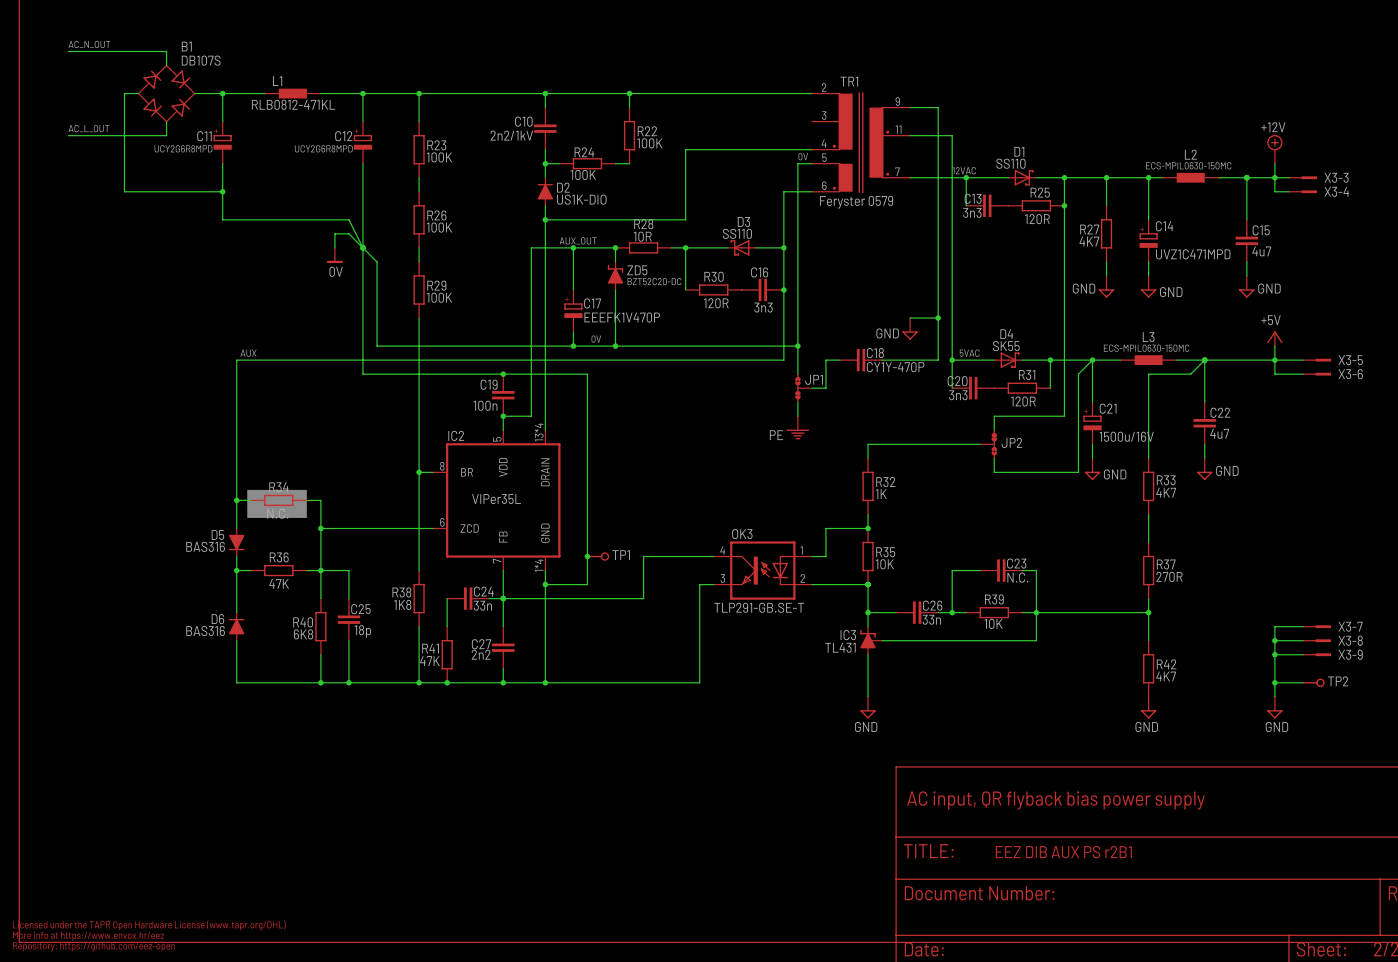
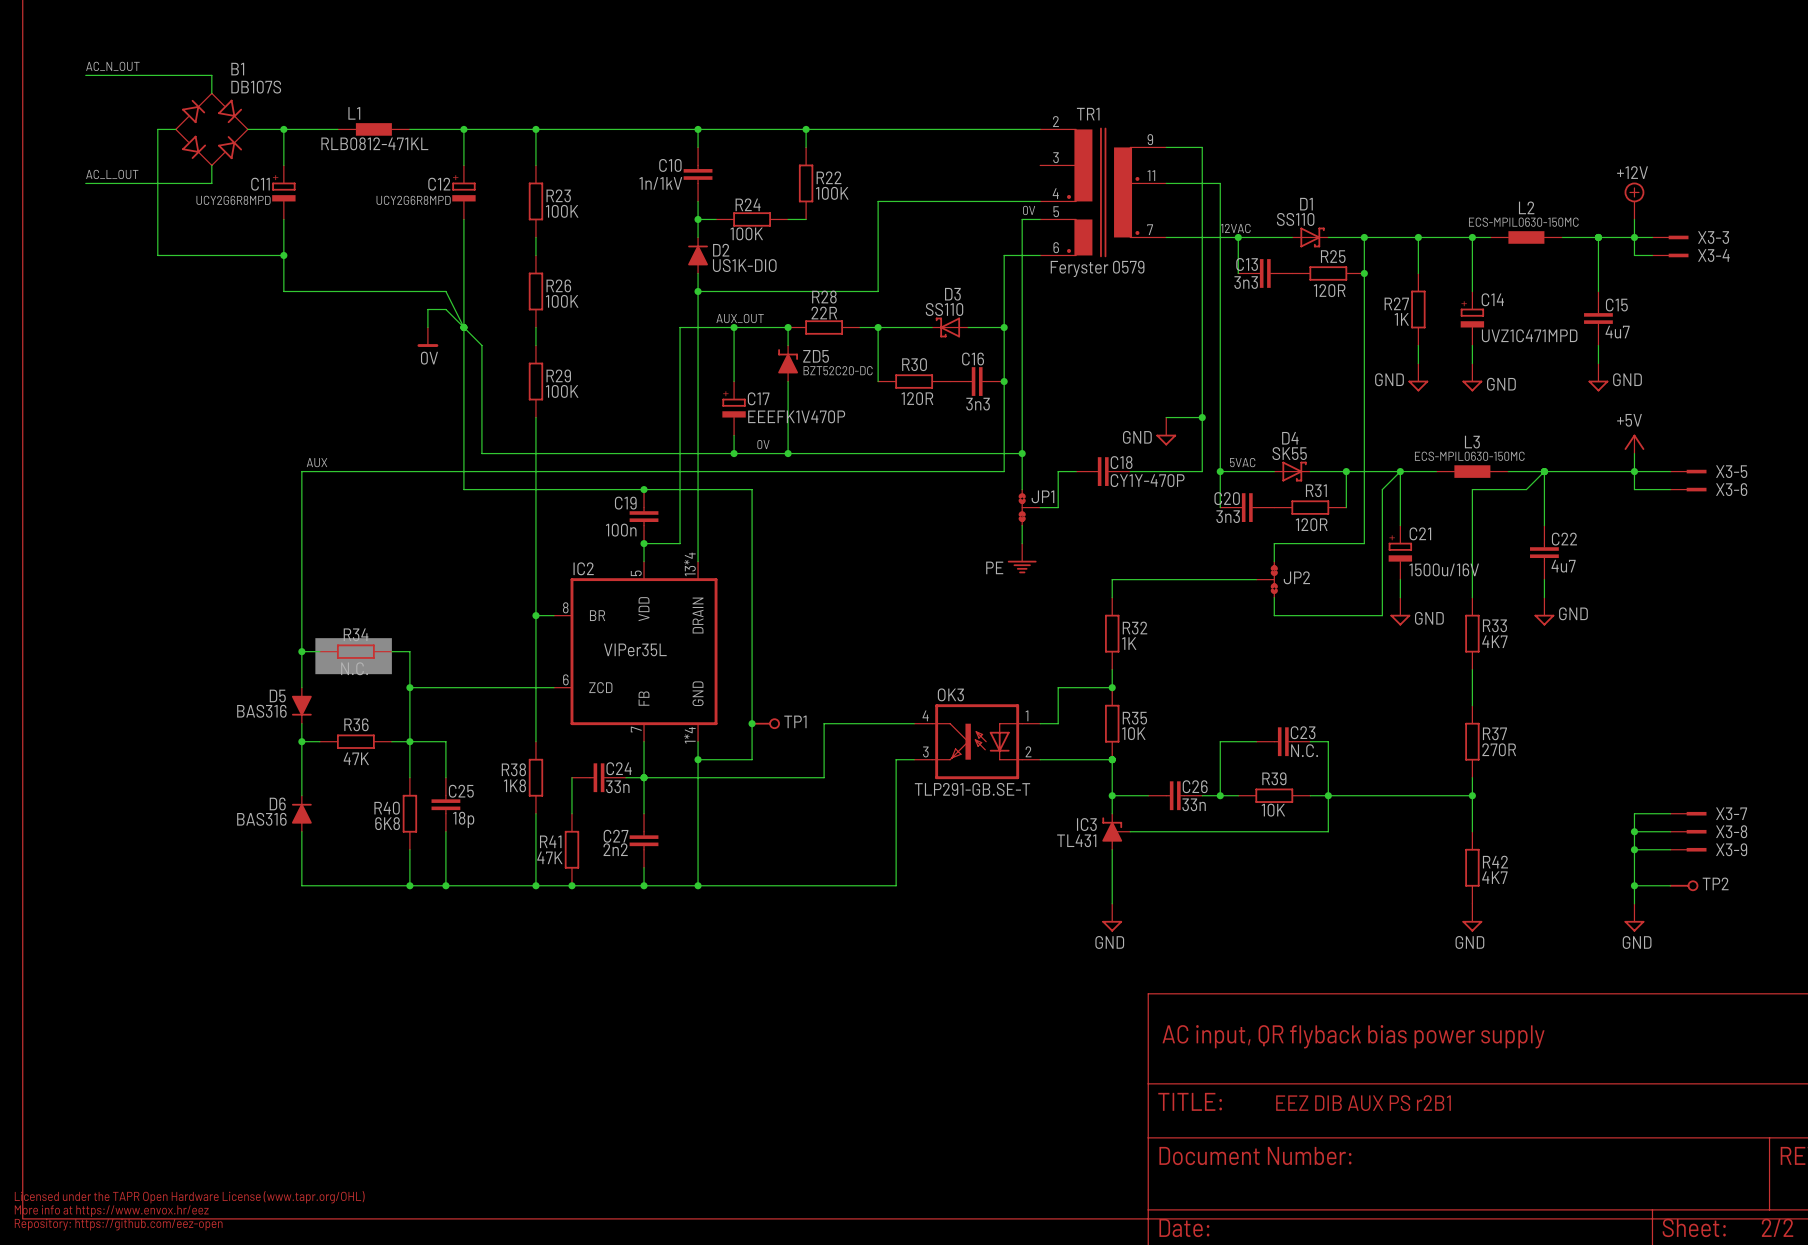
C10 value: 2n2/1kV (511, 135) -> 1n/1kV (660, 183)
R28 value: 10R (642, 236) -> 22R (824, 313)
R27 value: 4K7 (1089, 241) -> 1K (1401, 319)

